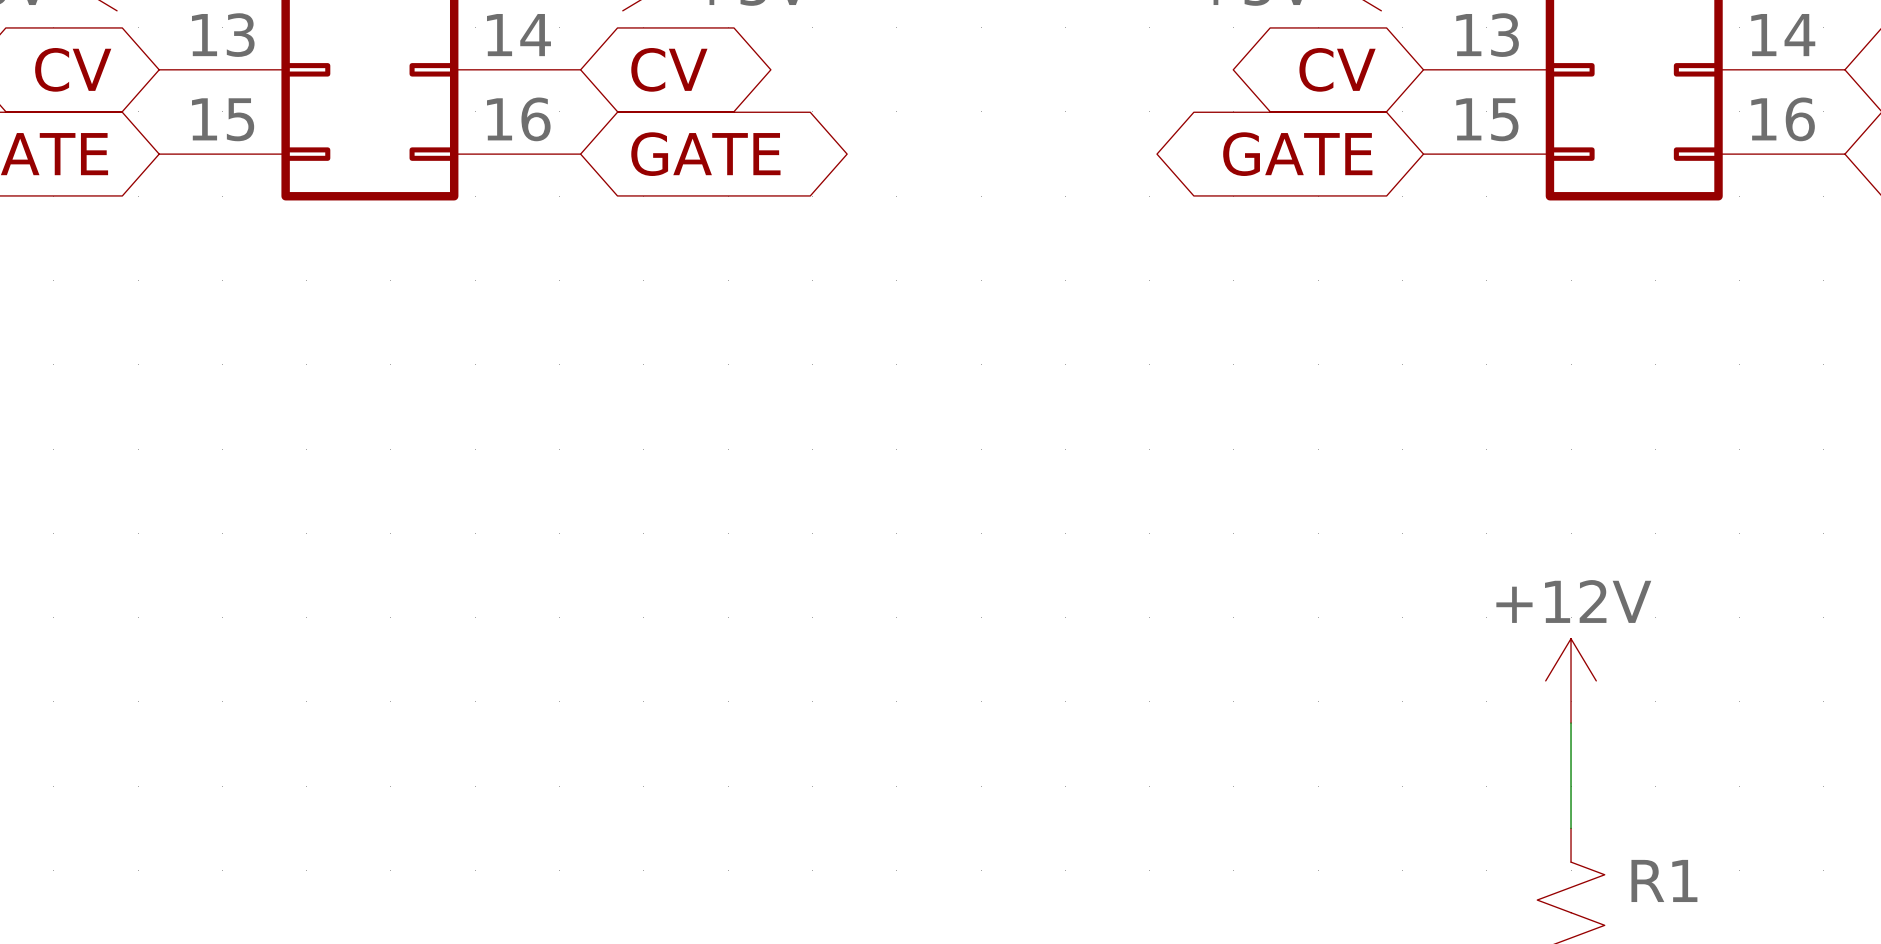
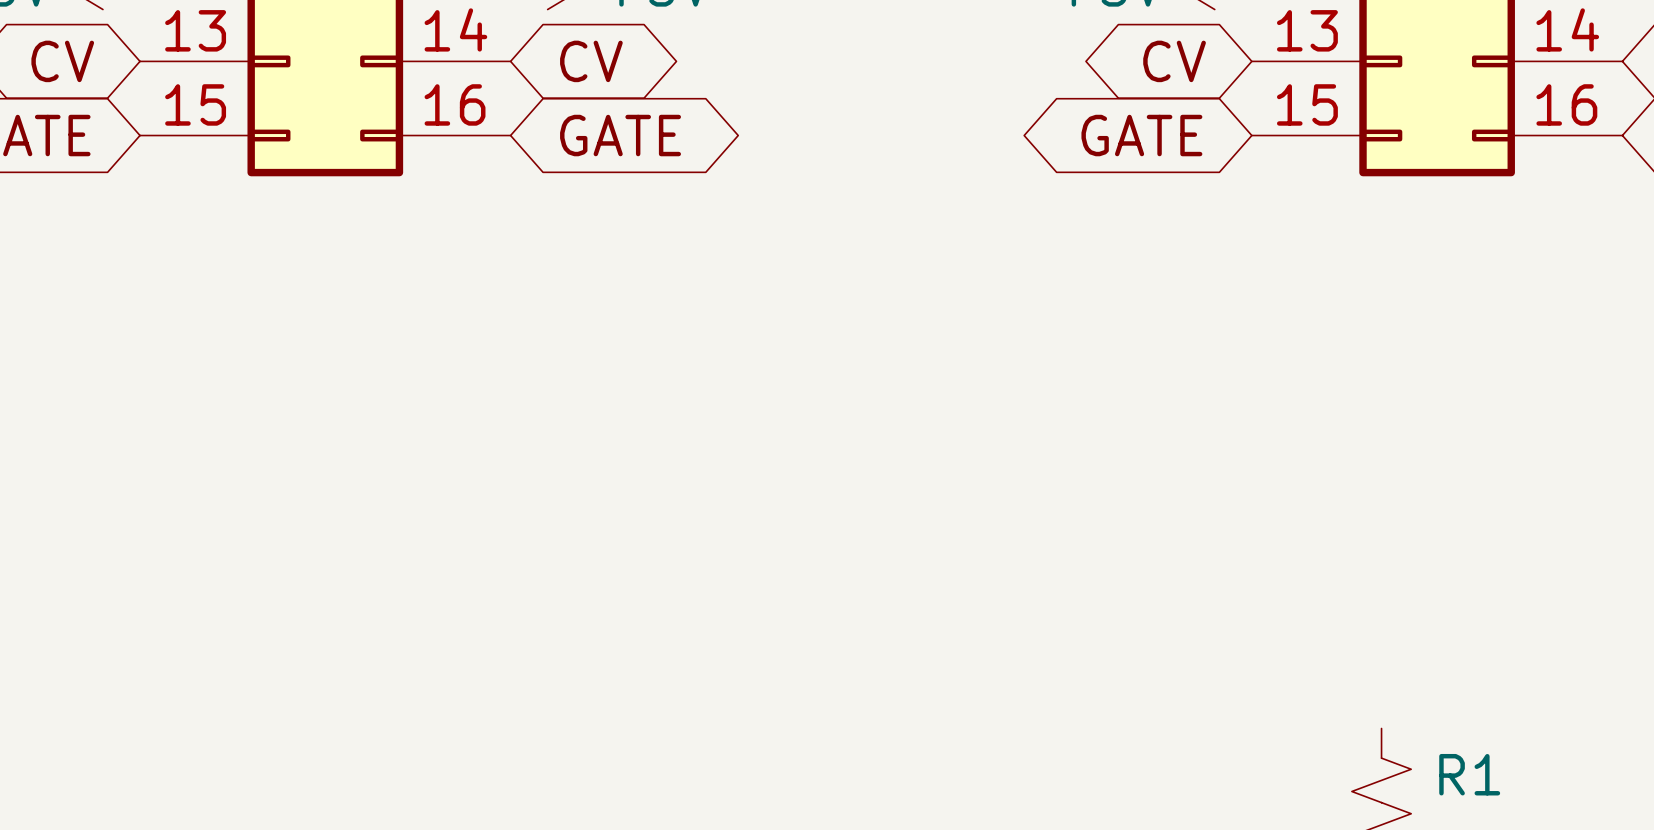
power symbol: +12V (1571, 680) -> none
wire: (1571, 723) (1571, 828) -> none

